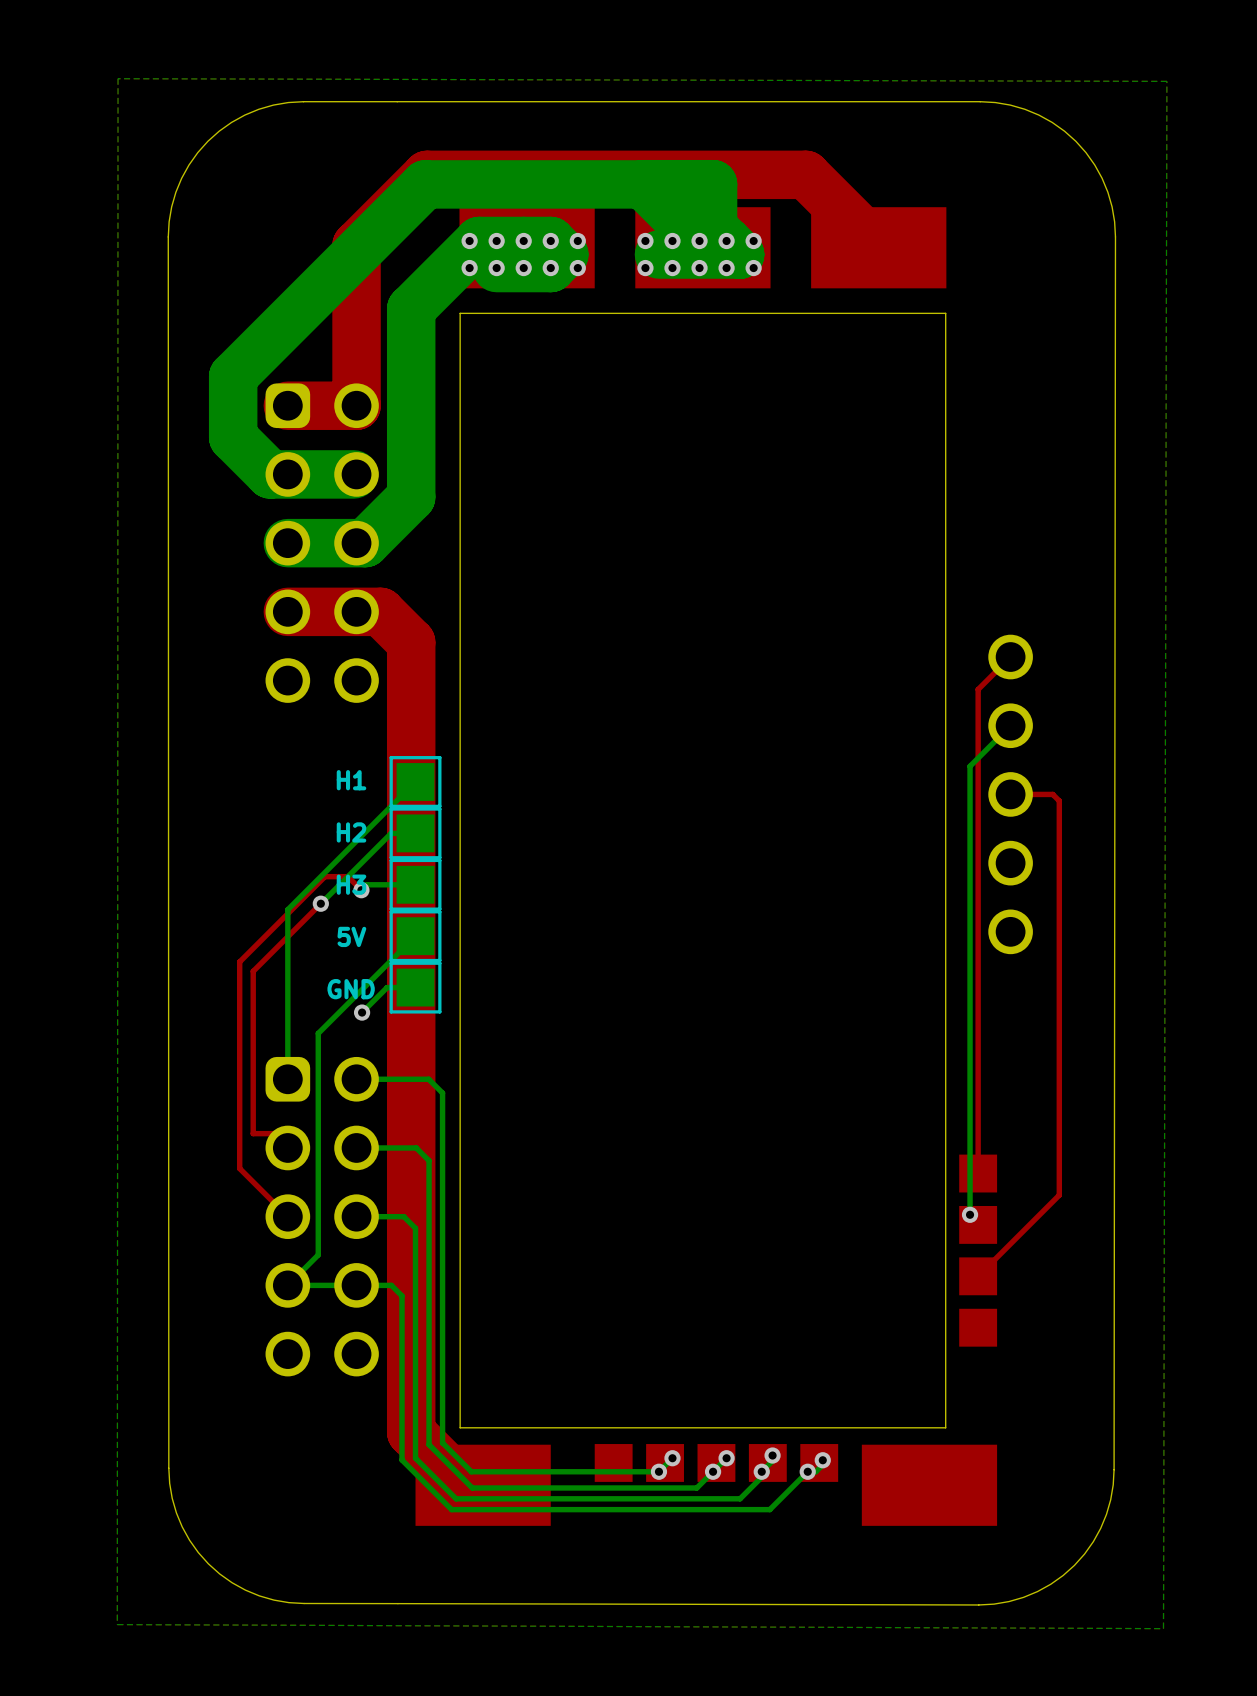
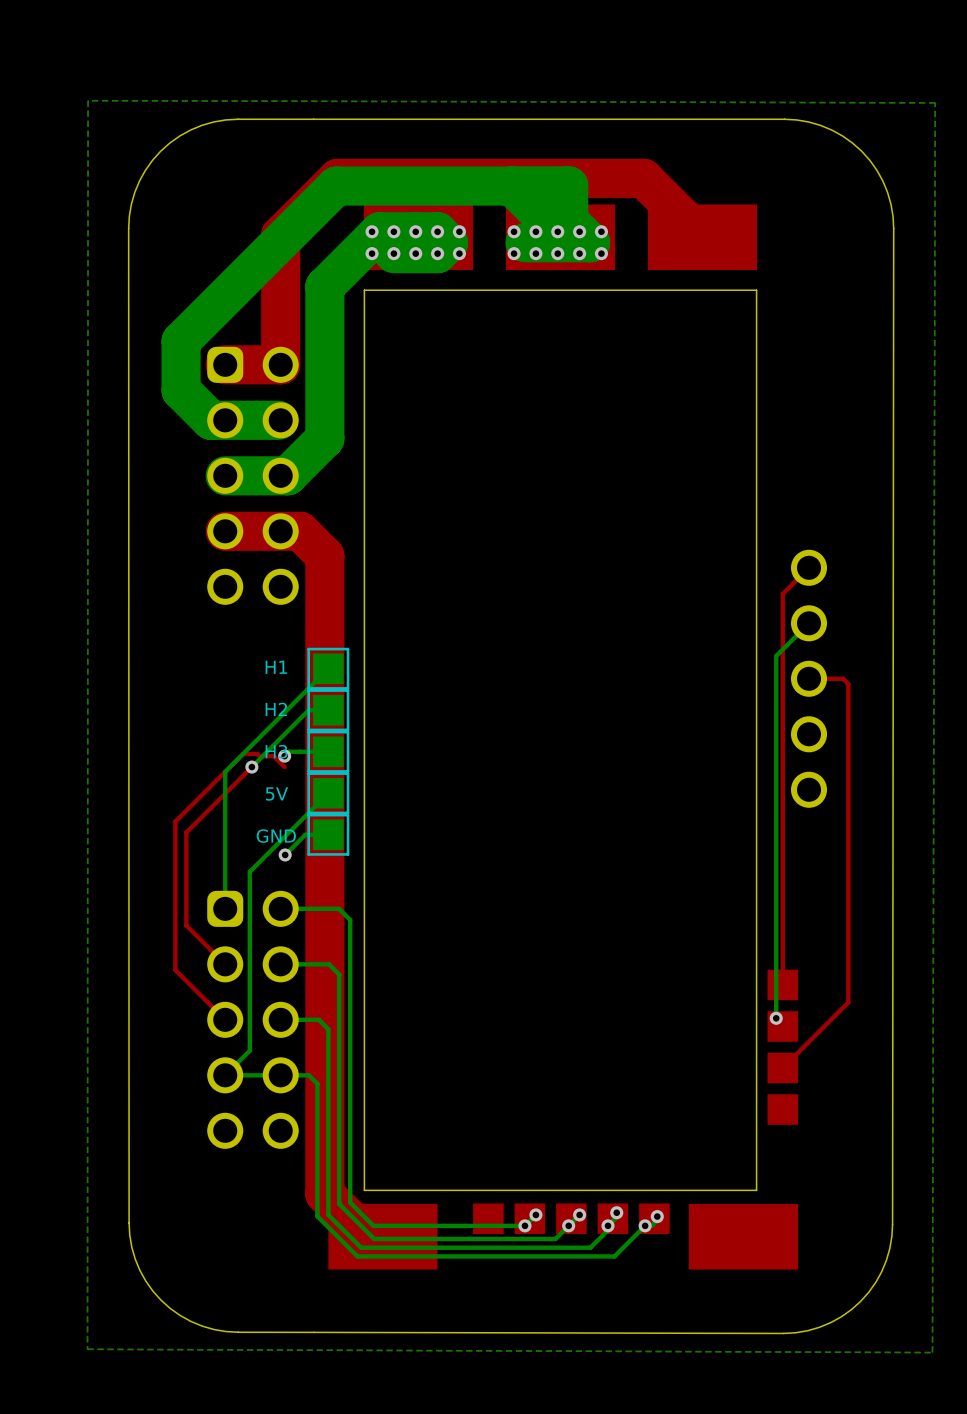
top track: (361, 890) (347, 876) (324, 876) (239, 961) (239, 984) -> (197, 821) (186, 832)
top track: none -> (284, 767) (273, 756) (243, 753) (175, 821) (175, 970) (186, 980)
top track: (253, 971) (253, 1133) (273, 1133) -> none
top track: (239, 1099) (239, 1168) -> (186, 925) (213, 952)

